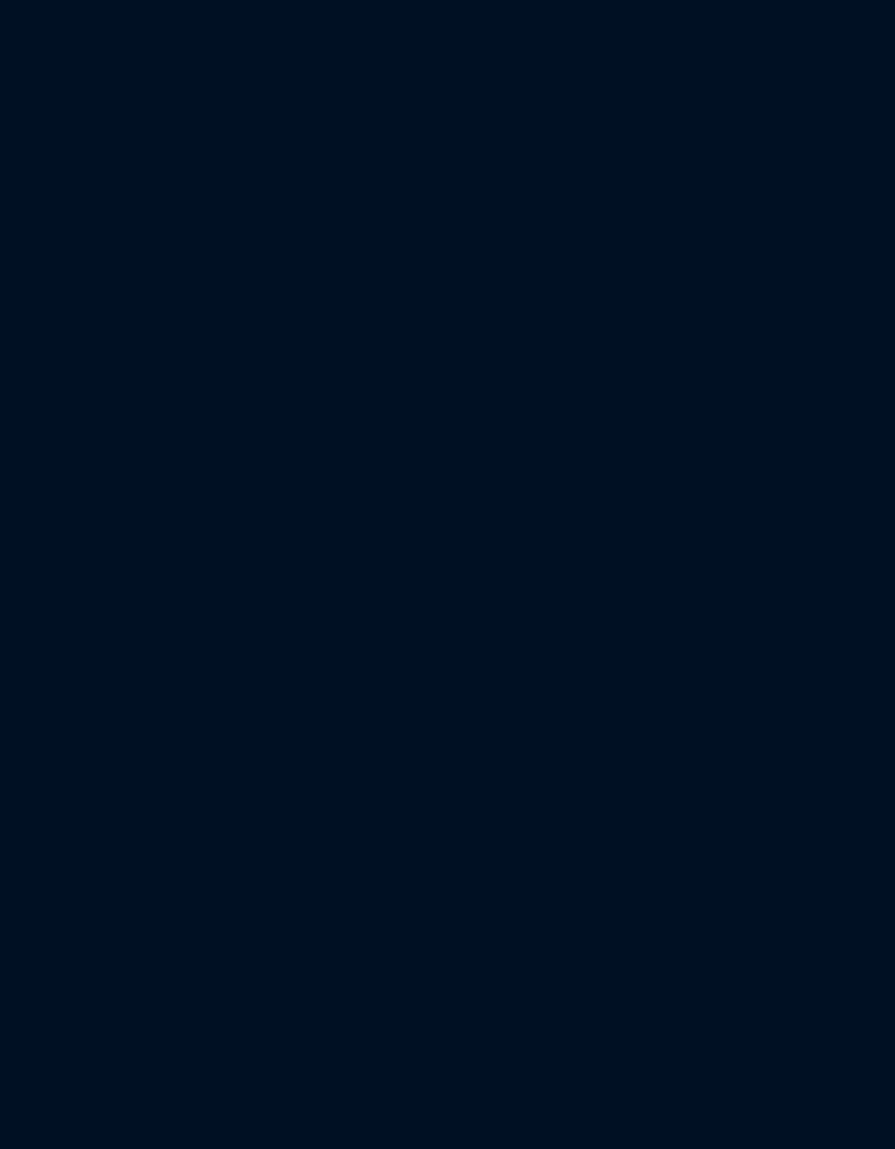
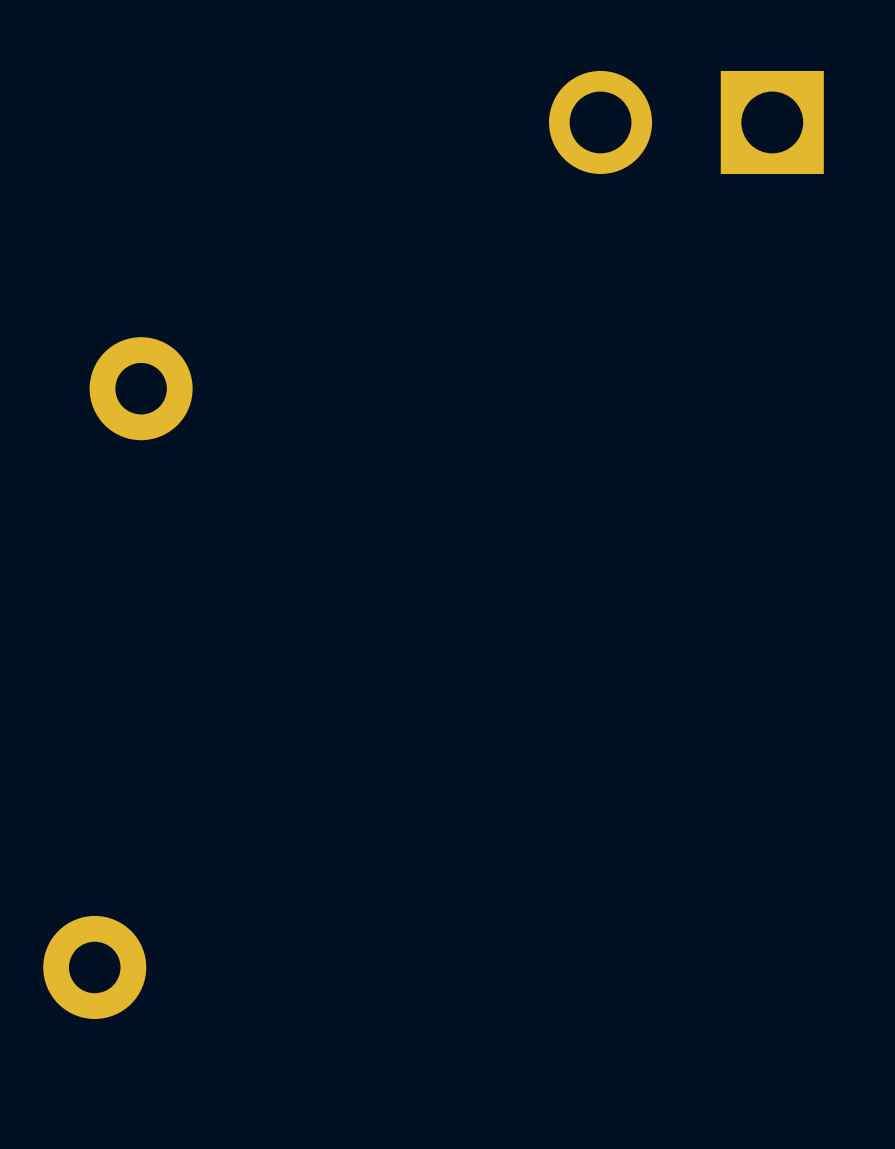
part: none -> (686, 122)
part: none -> (141, 388)
part: none -> (94, 967)

